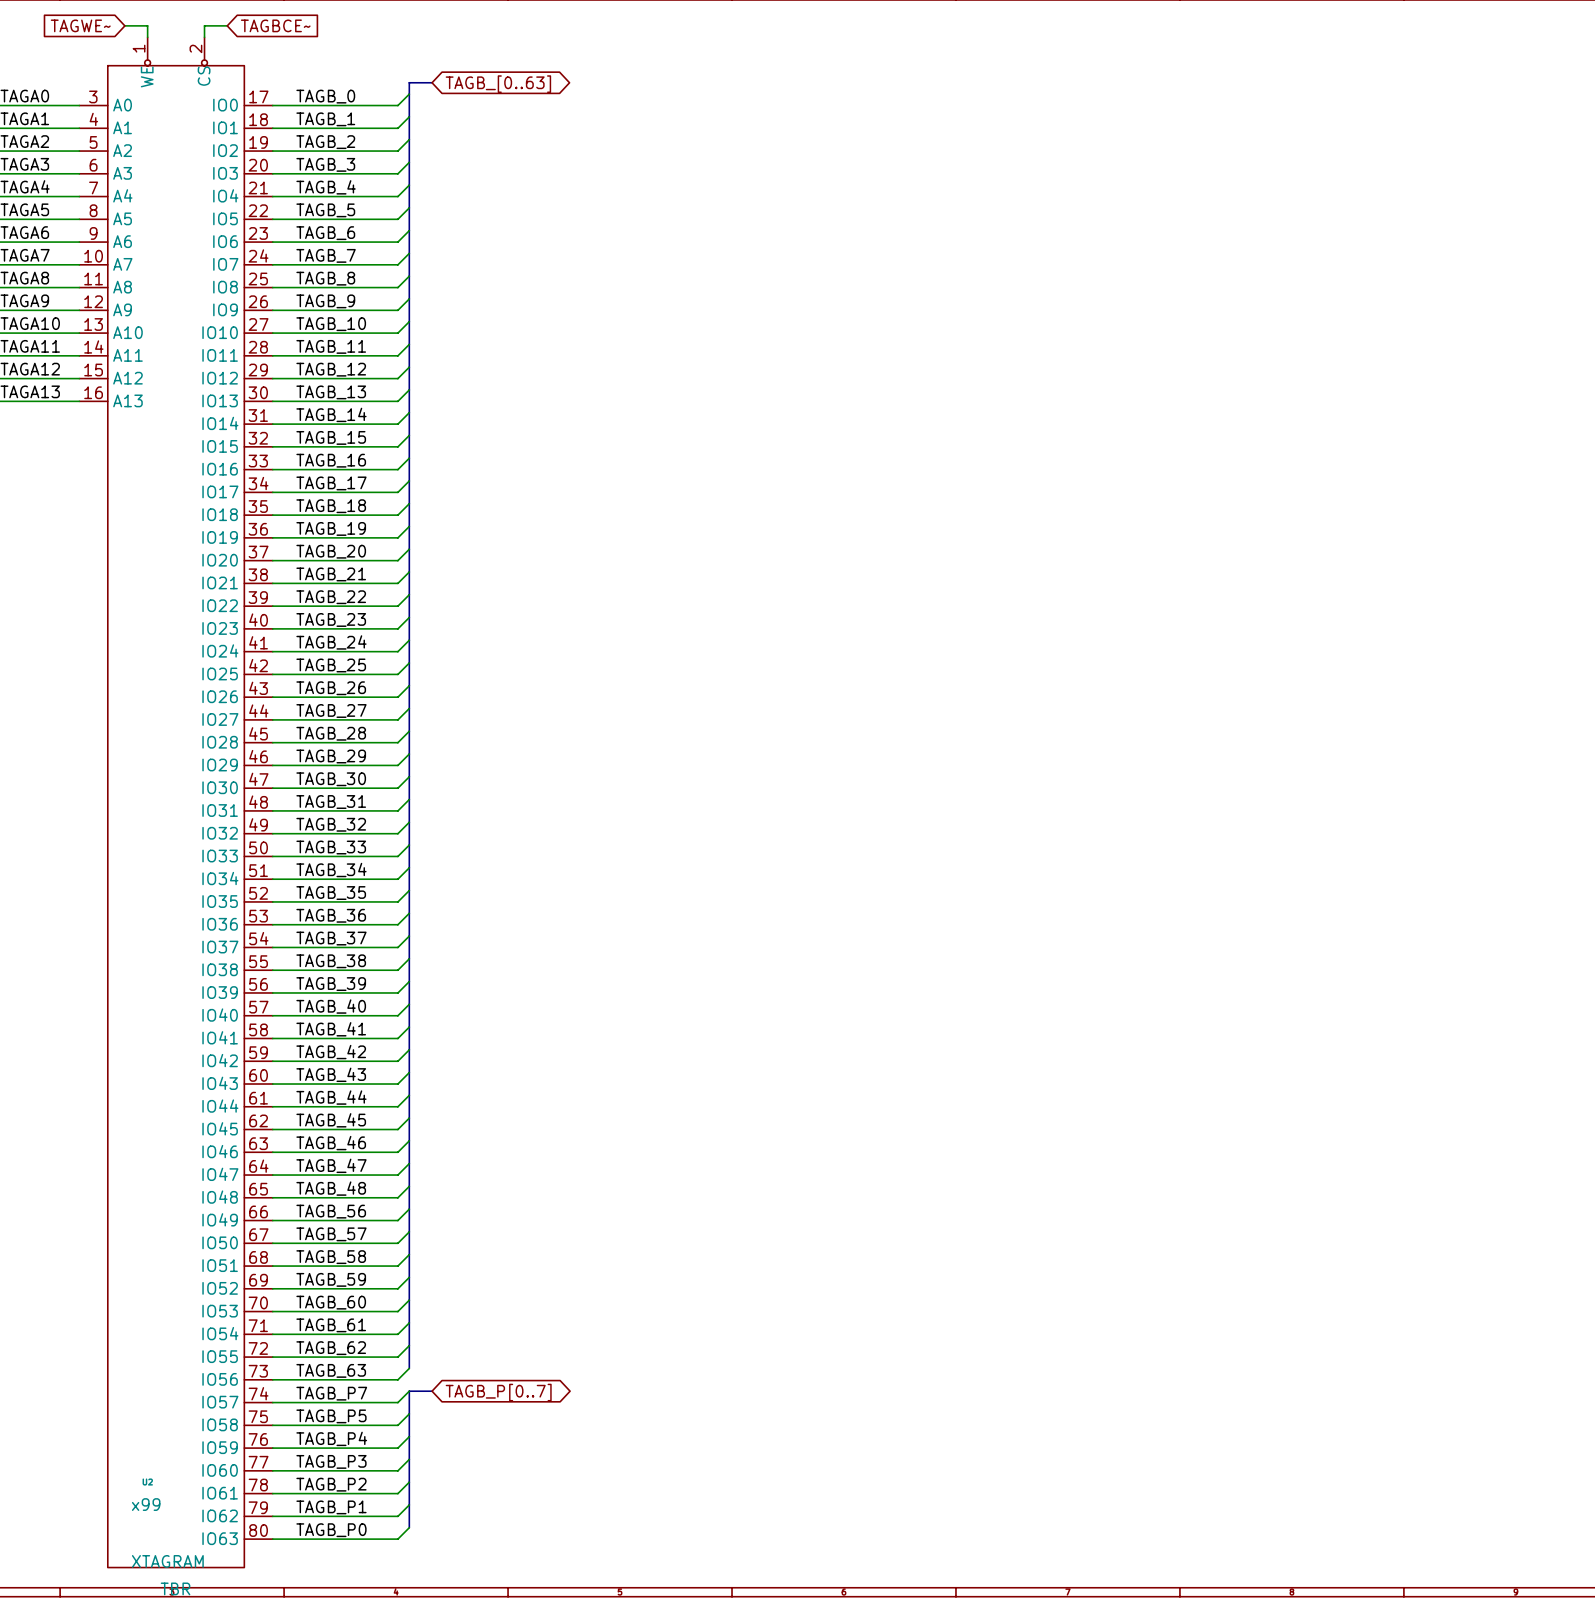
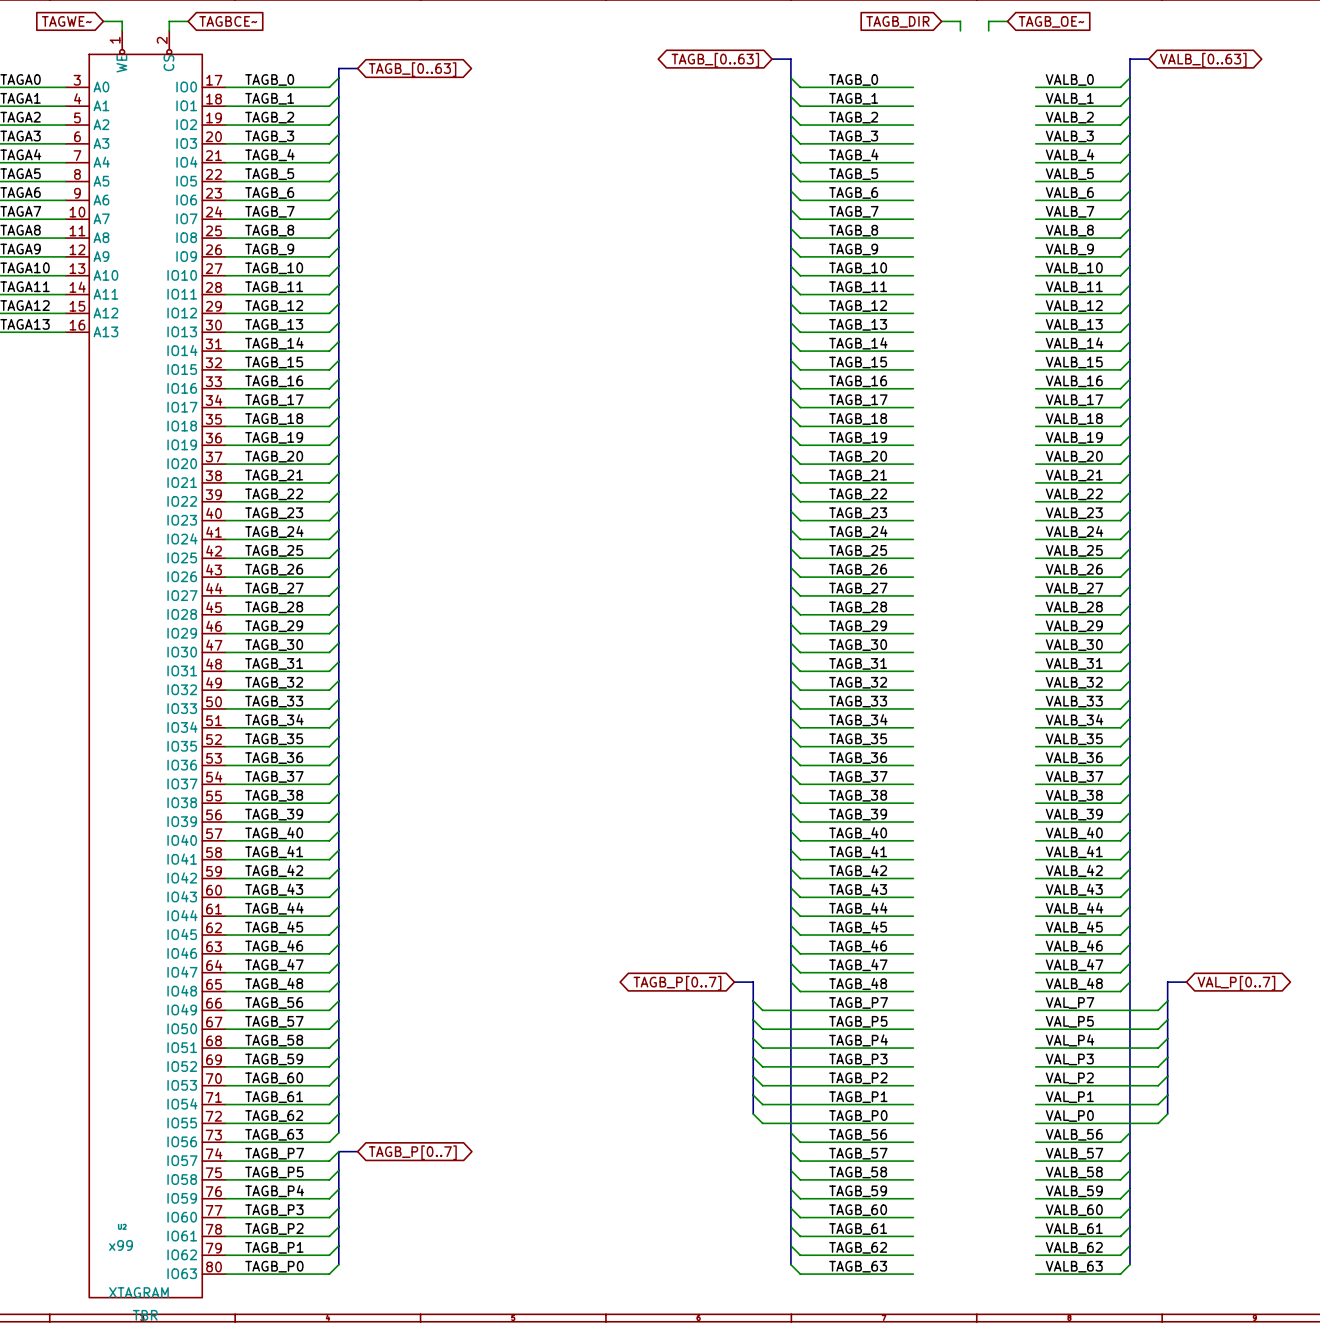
wire: none -> (941, 21) (960, 21) (960, 30)
wire: none -> (1007, 21) (988, 21) (988, 30)
global label: none -> TAGB_DIR (897, 21)
global label: none -> TAGB_OE~ (1051, 21)
bus: none -> (772, 59) (790, 59) (790, 1264)
bus: none -> (1148, 59) (1129, 59) (1129, 1264)
global label: none -> TAGB_[0..63] (715, 60)
global label: none -> VALB_[0..63] (1203, 60)
wire: none -> (790, 77) (800, 87) (913, 87)
wire: none -> (1129, 77) (1120, 87) (1035, 87)
label: none -> TAGB_0 (853, 79)
label: none -> VALB_0 (1069, 79)
wire: none -> (790, 96) (800, 106) (913, 106)
wire: none -> (1129, 96) (1120, 106) (1035, 106)
label: none -> TAGB_1 (853, 98)
label: none -> VALB_1 (1069, 98)
wire: none -> (790, 115) (800, 125) (913, 125)
wire: none -> (1129, 115) (1120, 125) (1035, 125)
label: none -> TAGB_2 (853, 117)
label: none -> VALB_2 (1069, 117)
wire: none -> (790, 134) (800, 143) (913, 143)
wire: none -> (1129, 134) (1120, 143) (1035, 143)
label: none -> TAGB_3 (853, 136)
label: none -> VALB_3 (1069, 136)
wire: none -> (790, 153) (800, 162) (913, 162)
wire: none -> (1129, 153) (1120, 162) (1035, 162)
label: none -> TAGB_4 (853, 155)
label: none -> VALB_4 (1070, 155)
wire: none -> (790, 172) (800, 181) (913, 181)
wire: none -> (1129, 172) (1120, 181) (1035, 181)
label: none -> TAGB_5 (853, 174)
label: none -> VALB_5 (1069, 174)
wire: none -> (790, 190) (800, 200) (913, 200)
wire: none -> (1129, 190) (1120, 200) (1035, 200)
label: none -> TAGB_6 (853, 192)
label: none -> VALB_6 (1069, 192)
wire: none -> (790, 209) (800, 219) (913, 219)
wire: none -> (1129, 209) (1120, 219) (1035, 219)
label: none -> TAGB_7 (853, 211)
label: none -> VALB_7 (1070, 211)
wire: none -> (790, 228) (800, 238) (913, 238)
wire: none -> (1129, 228) (1120, 238) (1035, 238)
label: none -> TAGB_8 (853, 230)
label: none -> VALB_8 (1069, 230)
wire: none -> (790, 247) (800, 256) (913, 256)
wire: none -> (1129, 247) (1120, 256) (1035, 256)
label: none -> TAGB_9 (853, 249)
label: none -> VALB_9 (1069, 249)
wire: none -> (790, 266) (800, 275) (913, 275)
wire: none -> (1129, 266) (1120, 275) (1035, 275)
label: none -> TAGB_10 (858, 268)
label: none -> VALB_10 (1074, 268)
wire: none -> (790, 285) (800, 294) (913, 294)
wire: none -> (1129, 285) (1120, 294) (1035, 294)
label: none -> TAGB_11 (858, 287)
label: none -> VALB_11 (1074, 287)
wire: none -> (790, 303) (800, 313) (913, 313)
wire: none -> (1129, 303) (1120, 313) (1035, 313)
label: none -> TAGB_12 (858, 306)
label: none -> VALB_12 (1074, 306)
wire: none -> (790, 322) (800, 332) (913, 332)
wire: none -> (1129, 322) (1120, 332) (1035, 332)
label: none -> TAGB_13 (858, 324)
label: none -> VALB_13 (1074, 324)
wire: none -> (790, 341) (800, 351) (913, 351)
wire: none -> (1129, 341) (1120, 351) (1035, 351)
label: none -> TAGB_14 (858, 343)
label: none -> VALB_14 (1074, 343)
wire: none -> (790, 360) (800, 369) (913, 369)
wire: none -> (1129, 360) (1120, 369) (1035, 369)
label: none -> TAGB_15 (858, 362)
label: none -> VALB_15 (1074, 362)
wire: none -> (790, 379) (800, 388) (913, 388)
wire: none -> (1129, 379) (1120, 388) (1035, 388)
label: none -> TAGB_16 (858, 381)
label: none -> VALB_16 (1074, 381)
wire: none -> (790, 398) (800, 407) (913, 407)
wire: none -> (1129, 398) (1120, 407) (1035, 407)
label: none -> TAGB_17 (858, 400)
label: none -> VALB_17 (1074, 400)
wire: none -> (790, 417) (800, 426) (913, 426)
wire: none -> (1129, 417) (1120, 426) (1035, 426)
label: none -> TAGB_18 (858, 419)
label: none -> VALB_18 (1074, 419)
wire: none -> (790, 435) (800, 445) (913, 445)
wire: none -> (1129, 435) (1120, 445) (1035, 445)
label: none -> TAGB_19 (858, 437)
label: none -> VALB_19 (1074, 437)
wire: none -> (790, 454) (800, 464) (913, 464)
wire: none -> (1129, 454) (1120, 464) (1035, 464)
label: none -> TAGB_20 (858, 456)
label: none -> VALB_20 (1074, 456)
wire: none -> (790, 473) (800, 482) (913, 482)
wire: none -> (1129, 473) (1120, 482) (1035, 482)
label: none -> TAGB_21 (858, 475)
label: none -> VALB_21 (1074, 475)
wire: none -> (790, 492) (800, 501) (913, 501)
wire: none -> (1129, 492) (1120, 501) (1035, 501)
label: none -> TAGB_22 (858, 494)
label: none -> VALB_22 (1074, 494)
wire: none -> (790, 511) (800, 520) (913, 520)
wire: none -> (1129, 511) (1120, 520) (1035, 520)
label: none -> TAGB_23 (858, 513)
label: none -> VALB_23 (1074, 513)
wire: none -> (790, 530) (800, 539) (913, 539)
wire: none -> (1129, 530) (1120, 539) (1035, 539)
label: none -> TAGB_24 (858, 531)
label: none -> VALB_24 (1074, 531)
wire: none -> (790, 548) (800, 558) (913, 558)
wire: none -> (1129, 548) (1120, 558) (1035, 558)
label: none -> TAGB_25 (858, 550)
label: none -> VALB_25 (1074, 550)
wire: none -> (790, 567) (800, 577) (913, 577)
wire: none -> (1129, 567) (1120, 577) (1035, 577)
label: none -> TAGB_26 (858, 569)
label: none -> VALB_26 (1074, 569)
wire: none -> (790, 586) (800, 595) (913, 595)
wire: none -> (1129, 586) (1120, 595) (1035, 595)
label: none -> TAGB_27 (858, 588)
label: none -> VALB_27 (1074, 588)
wire: none -> (790, 605) (800, 614) (913, 614)
wire: none -> (1129, 605) (1120, 614) (1035, 614)
label: none -> TAGB_28 (858, 607)
label: none -> VALB_28 (1074, 607)
wire: none -> (790, 624) (800, 633) (913, 633)
wire: none -> (1129, 624) (1120, 633) (1035, 633)
label: none -> TAGB_29 (858, 626)
label: none -> VALB_29 (1074, 626)
wire: none -> (790, 643) (800, 652) (913, 652)
wire: none -> (1129, 643) (1120, 652) (1035, 652)
label: none -> TAGB_30 (858, 645)
label: none -> VALB_30 (1074, 645)
wire: none -> (790, 661) (800, 671) (913, 671)
wire: none -> (1129, 661) (1120, 671) (1035, 671)
label: none -> TAGB_31 (858, 663)
label: none -> VALB_31 (1074, 663)
wire: none -> (790, 680) (800, 690) (913, 690)
wire: none -> (1129, 680) (1120, 690) (1035, 690)
label: none -> TAGB_32 (858, 682)
label: none -> VALB_32 (1074, 682)
wire: none -> (790, 699) (800, 708) (913, 708)
wire: none -> (1129, 699) (1120, 708) (1035, 708)
label: none -> TAGB_33 (858, 701)
label: none -> VALB_33 (1074, 701)
wire: none -> (790, 718) (800, 727) (913, 727)
wire: none -> (1129, 718) (1120, 727) (1035, 727)
label: none -> TAGB_34 (858, 720)
label: none -> VALB_34 (1074, 720)
wire: none -> (790, 737) (800, 746) (913, 746)
wire: none -> (1129, 737) (1120, 746) (1035, 746)
label: none -> TAGB_35 (858, 739)
label: none -> VALB_35 (1074, 739)
wire: none -> (790, 756) (800, 765) (913, 765)
wire: none -> (1129, 756) (1120, 765) (1035, 765)
label: none -> TAGB_36 (858, 758)
label: none -> VALB_36 (1074, 758)
wire: none -> (790, 774) (800, 784) (913, 784)
wire: none -> (1129, 774) (1120, 784) (1035, 784)
label: none -> TAGB_37 (858, 776)
label: none -> VALB_37 (1074, 776)
wire: none -> (790, 793) (800, 803) (913, 803)
wire: none -> (1129, 793) (1120, 803) (1035, 803)
label: none -> TAGB_38 (858, 795)
label: none -> VALB_38 (1074, 795)
wire: none -> (790, 812) (800, 821) (913, 821)
wire: none -> (1129, 812) (1120, 821) (1035, 821)
label: none -> TAGB_39 (858, 814)
label: none -> VALB_39 (1074, 814)
wire: none -> (790, 831) (800, 840) (913, 840)
wire: none -> (1129, 831) (1120, 840) (1035, 840)
label: none -> TAGB_40 (858, 833)
label: none -> VALB_40 (1074, 833)
wire: none -> (790, 850) (800, 859) (913, 859)
wire: none -> (1129, 850) (1120, 859) (1035, 859)
label: none -> TAGB_41 (858, 852)
label: none -> VALB_41 (1074, 852)
wire: none -> (790, 869) (800, 878) (913, 878)
wire: none -> (1129, 869) (1120, 878) (1035, 878)
label: none -> TAGB_42 (858, 870)
label: none -> VALB_42 (1074, 870)
wire: none -> (790, 887) (800, 897) (913, 897)
wire: none -> (1129, 887) (1120, 897) (1035, 897)
label: none -> TAGB_43 (858, 889)
label: none -> VALB_43 (1074, 889)
wire: none -> (790, 906) (800, 916) (913, 916)
wire: none -> (1129, 906) (1120, 916) (1035, 916)
label: none -> TAGB_44 (858, 908)
label: none -> VALB_44 (1074, 908)
wire: none -> (790, 925) (800, 935) (913, 935)
wire: none -> (1129, 925) (1120, 935) (1035, 935)
label: none -> TAGB_45 (858, 927)
label: none -> VALB_45 (1074, 927)
wire: none -> (790, 944) (800, 953) (913, 953)
wire: none -> (1129, 944) (1120, 953) (1035, 953)
label: none -> TAGB_46 (858, 946)
label: none -> VALB_46 (1074, 946)
wire: none -> (790, 963) (800, 972) (913, 972)
wire: none -> (1129, 963) (1120, 972) (1035, 972)
label: none -> TAGB_47 (858, 965)
label: none -> VALB_47 (1074, 965)
bus: none -> (734, 982) (753, 982) (753, 1113)
wire: none -> (790, 982) (800, 991) (913, 991)
wire: none -> (1129, 982) (1120, 991) (1035, 991)
bus: none -> (1186, 982) (1167, 982) (1167, 1113)
global label: none -> TAGB_P[0..7] (677, 983)
global label: none -> VAL_P[0..7] (1236, 983)
label: none -> TAGB_48 (858, 983)
label: none -> VALB_48 (1074, 983)
wire: none -> (753, 1000) (762, 1010) (913, 1010)
wire: none -> (1167, 1000) (1158, 1010) (1035, 1010)
label: none -> TAGB_P7 (858, 1002)
label: none -> VAL_P7 (1070, 1002)
wire: none -> (753, 1019) (762, 1029) (913, 1029)
wire: none -> (1167, 1019) (1158, 1029) (1035, 1029)
label: none -> TAGB_P5 (858, 1021)
label: none -> VAL_P5 (1069, 1021)
wire: none -> (753, 1038) (762, 1048) (913, 1048)
wire: none -> (1167, 1038) (1158, 1048) (1035, 1048)
label: none -> TAGB_P4 (858, 1040)
label: none -> VAL_P4 (1070, 1040)
wire: none -> (753, 1057) (762, 1066) (913, 1066)
wire: none -> (1167, 1057) (1158, 1066) (1035, 1066)
label: none -> TAGB_P3 (858, 1059)
label: none -> VAL_P3 (1069, 1059)
wire: none -> (753, 1076) (762, 1085) (913, 1085)
wire: none -> (1167, 1076) (1158, 1085) (1035, 1085)
label: none -> TAGB_P2 (858, 1078)
label: none -> VAL_P2 (1069, 1078)
wire: none -> (753, 1095) (762, 1104) (913, 1104)
wire: none -> (1167, 1095) (1158, 1104) (1035, 1104)
label: none -> TAGB_P1 (858, 1097)
label: none -> VAL_P1 (1069, 1097)
wire: none -> (753, 1113) (762, 1123) (913, 1123)
wire: none -> (1167, 1113) (1158, 1123) (1035, 1123)
label: none -> TAGB_P0 (858, 1115)
label: none -> VAL_P0 (1069, 1115)
wire: none -> (790, 1132) (800, 1142) (913, 1142)
wire: none -> (1129, 1132) (1120, 1142) (1035, 1142)
label: none -> TAGB_56 (858, 1134)
label: none -> VALB_56 (1074, 1134)
wire: none -> (790, 1151) (800, 1161) (913, 1161)
wire: none -> (1129, 1151) (1120, 1161) (1035, 1161)
label: none -> TAGB_57 (858, 1153)
label: none -> VALB_57 (1074, 1153)
wire: none -> (790, 1170) (800, 1179) (913, 1179)
wire: none -> (1129, 1170) (1120, 1179) (1035, 1179)
label: none -> TAGB_58 (858, 1172)
label: none -> VALB_58 (1074, 1172)
wire: none -> (790, 1189) (800, 1198) (913, 1198)
wire: none -> (1129, 1189) (1120, 1198) (1035, 1198)
label: none -> TAGB_59 (858, 1191)
label: none -> VALB_59 (1074, 1191)
wire: none -> (790, 1208) (800, 1217) (913, 1217)
wire: none -> (1129, 1208) (1120, 1217) (1035, 1217)
label: none -> TAGB_60 (858, 1210)
label: none -> VALB_60 (1074, 1210)
wire: none -> (790, 1226) (800, 1236) (913, 1236)
wire: none -> (1129, 1226) (1120, 1236) (1035, 1236)
label: none -> TAGB_61 (858, 1229)
label: none -> VALB_61 (1074, 1229)
wire: none -> (790, 1245) (800, 1255) (913, 1255)
wire: none -> (1129, 1245) (1120, 1255) (1035, 1255)
label: none -> TAGB_62 (858, 1247)
label: none -> VALB_62 (1074, 1247)
wire: none -> (790, 1264) (800, 1274) (913, 1274)
wire: none -> (1129, 1264) (1120, 1274) (1035, 1274)
label: none -> TAGB_63 (858, 1266)
label: none -> VALB_63 (1074, 1266)

